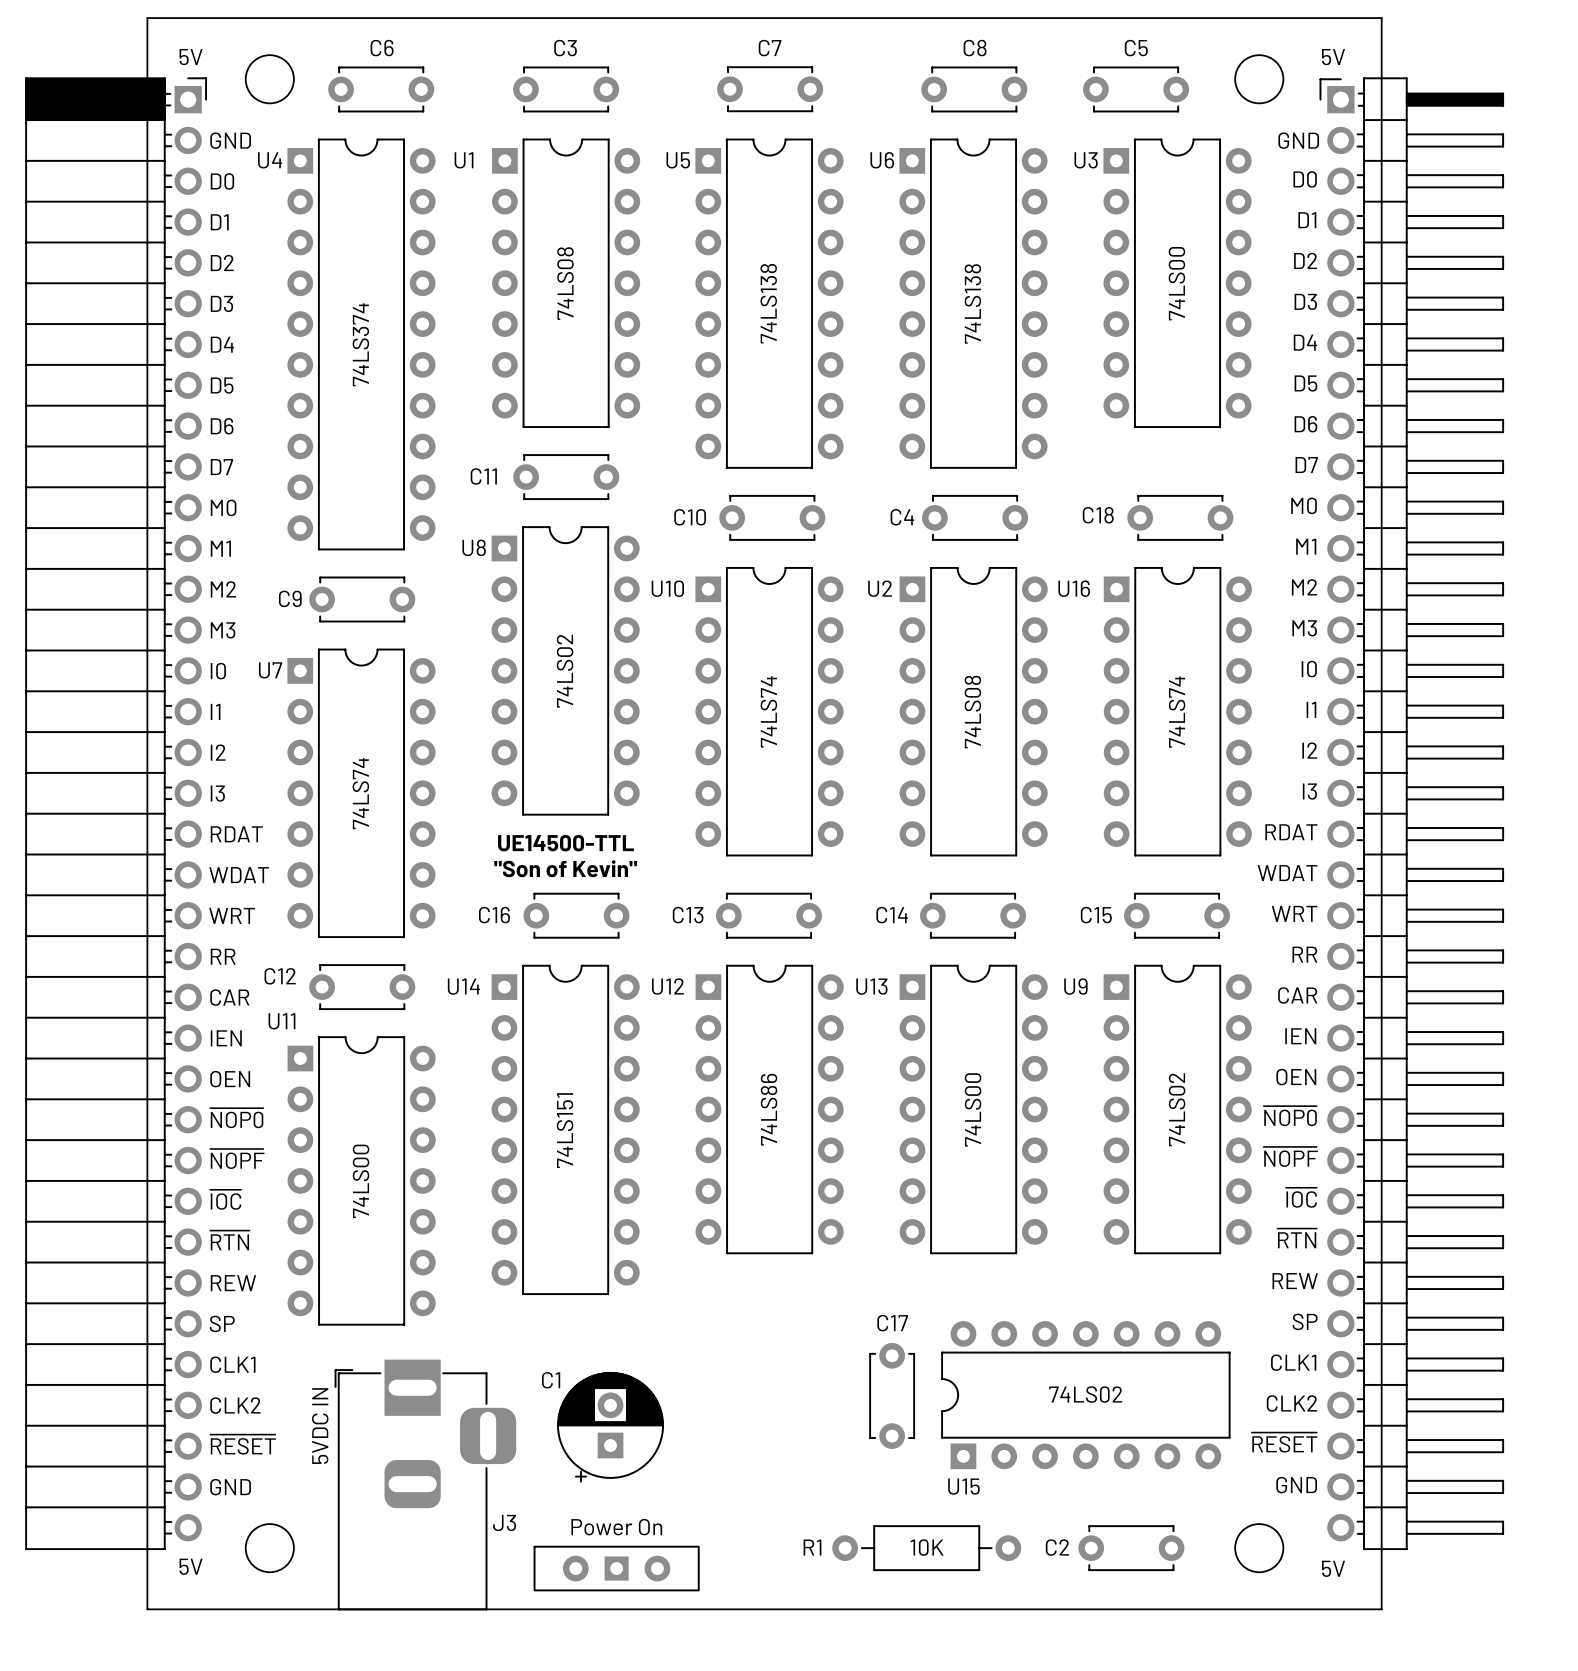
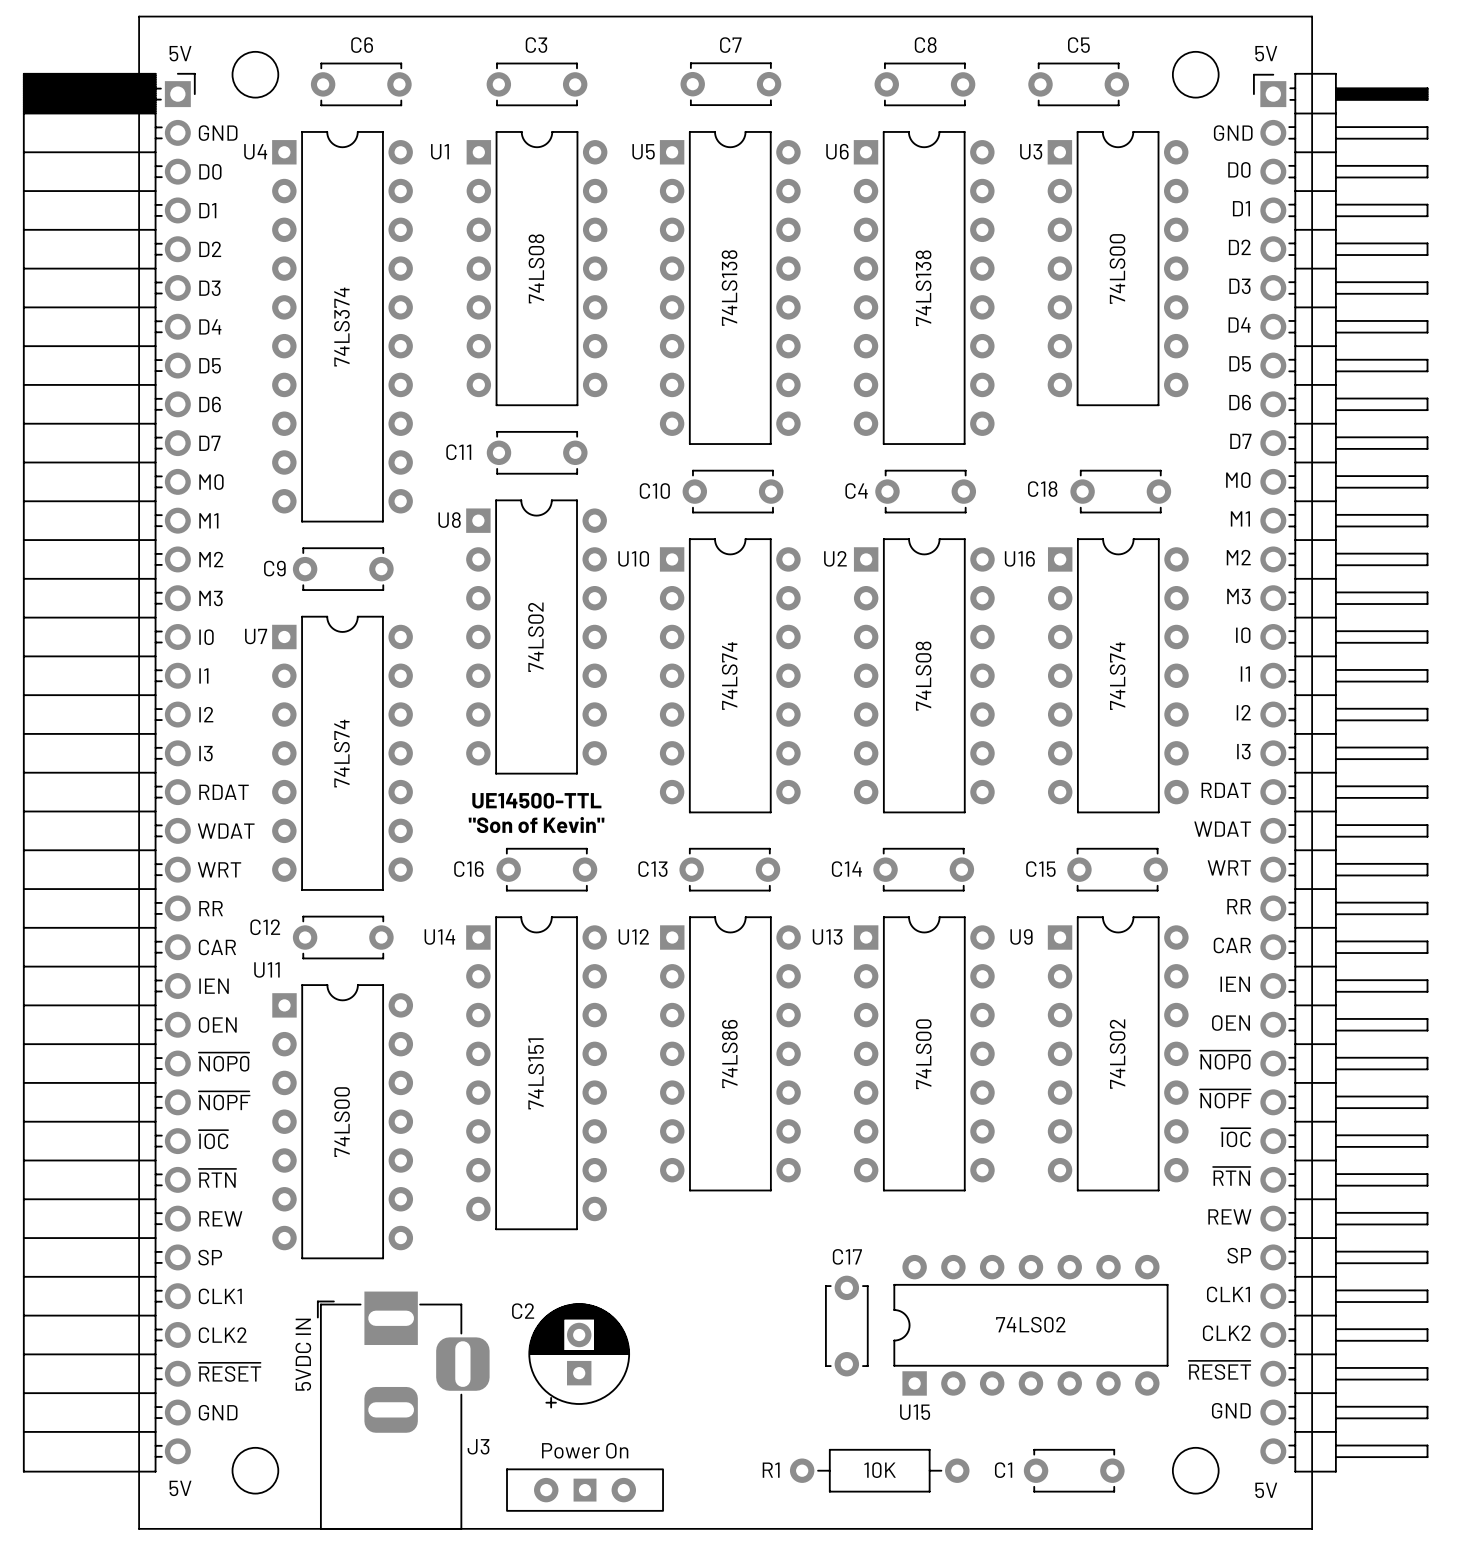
C1 name: C1 (551, 1380) -> C2 (523, 1311)
C2 name: C2 (1057, 1547) -> C1 (1003, 1470)

